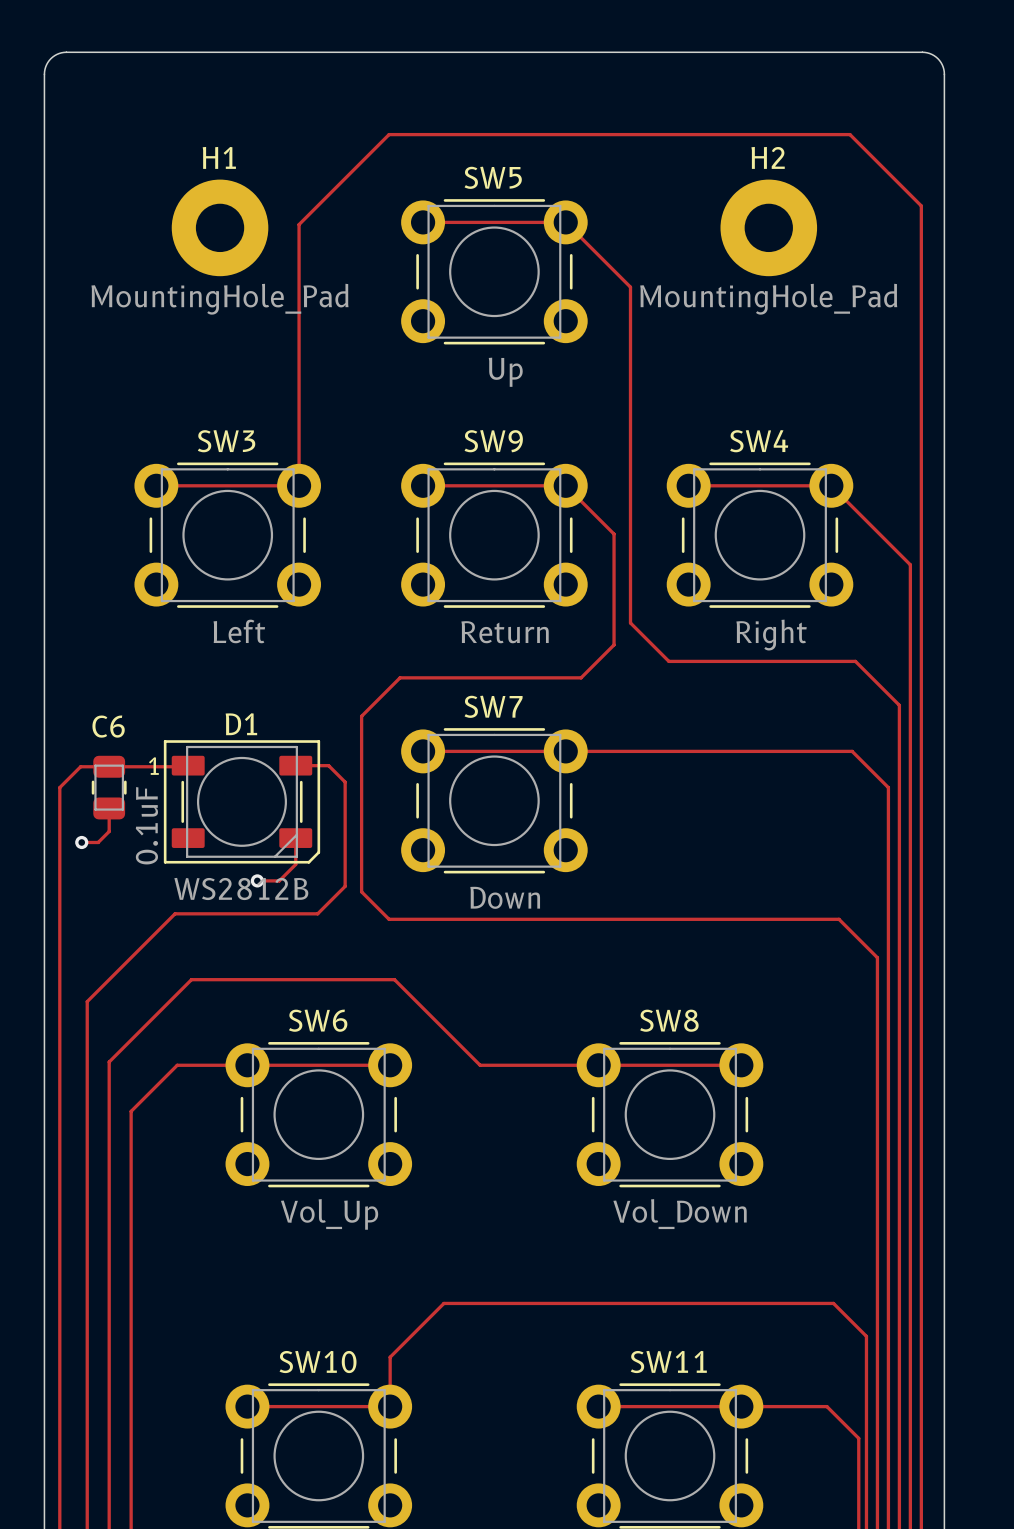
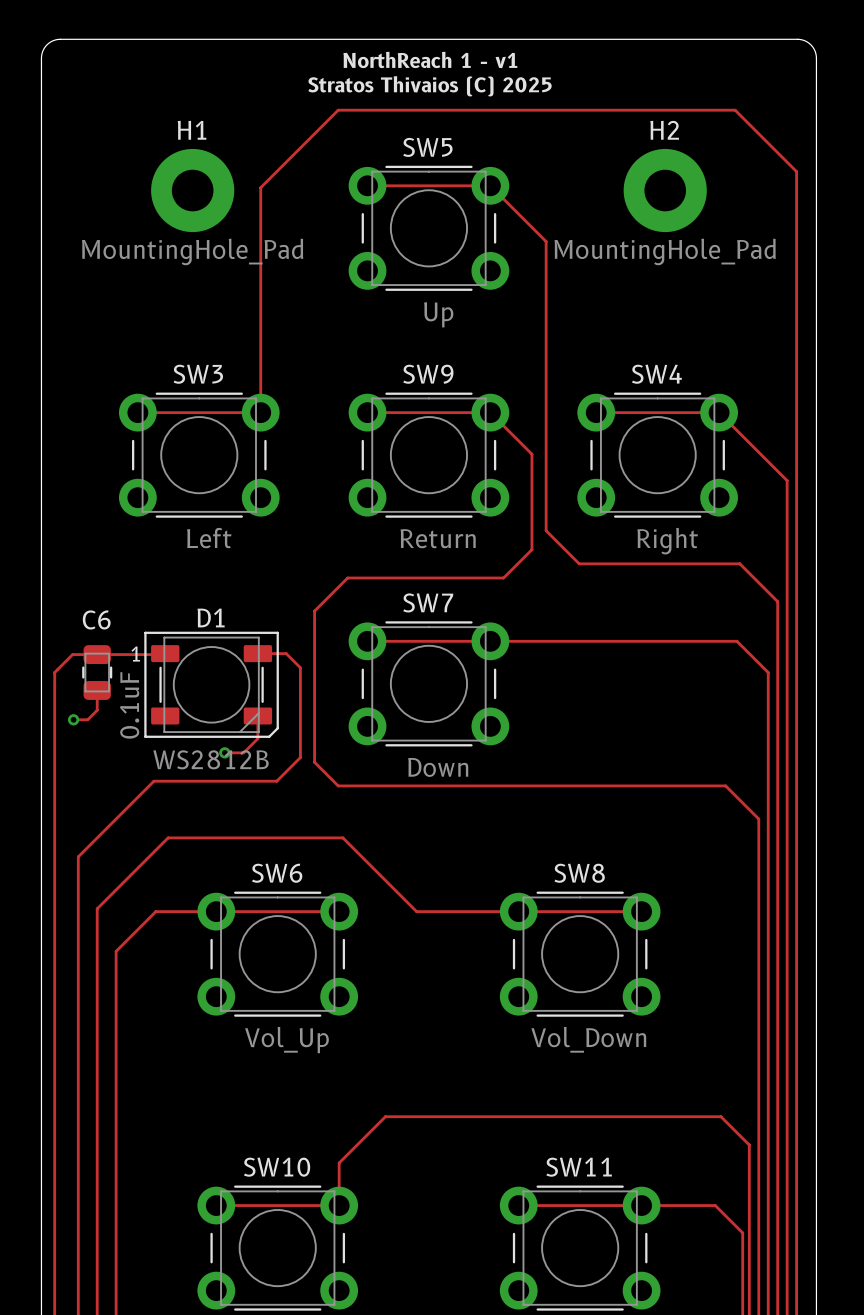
text: none -> NorthReach 1 - v1 (430, 59)
text: none -> Stratos Thivaios (C) 2025 (430, 86)

